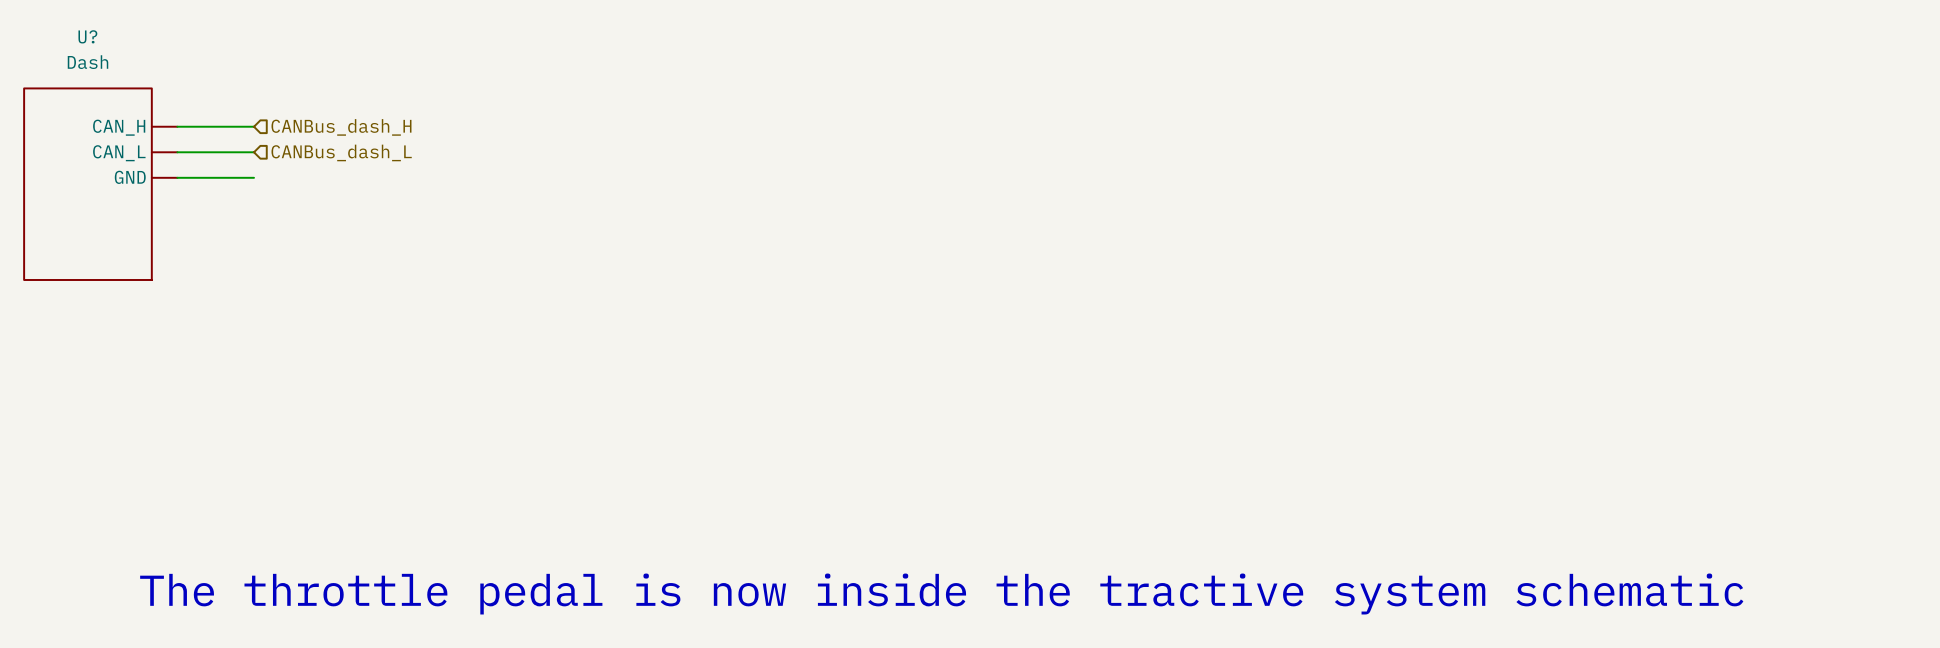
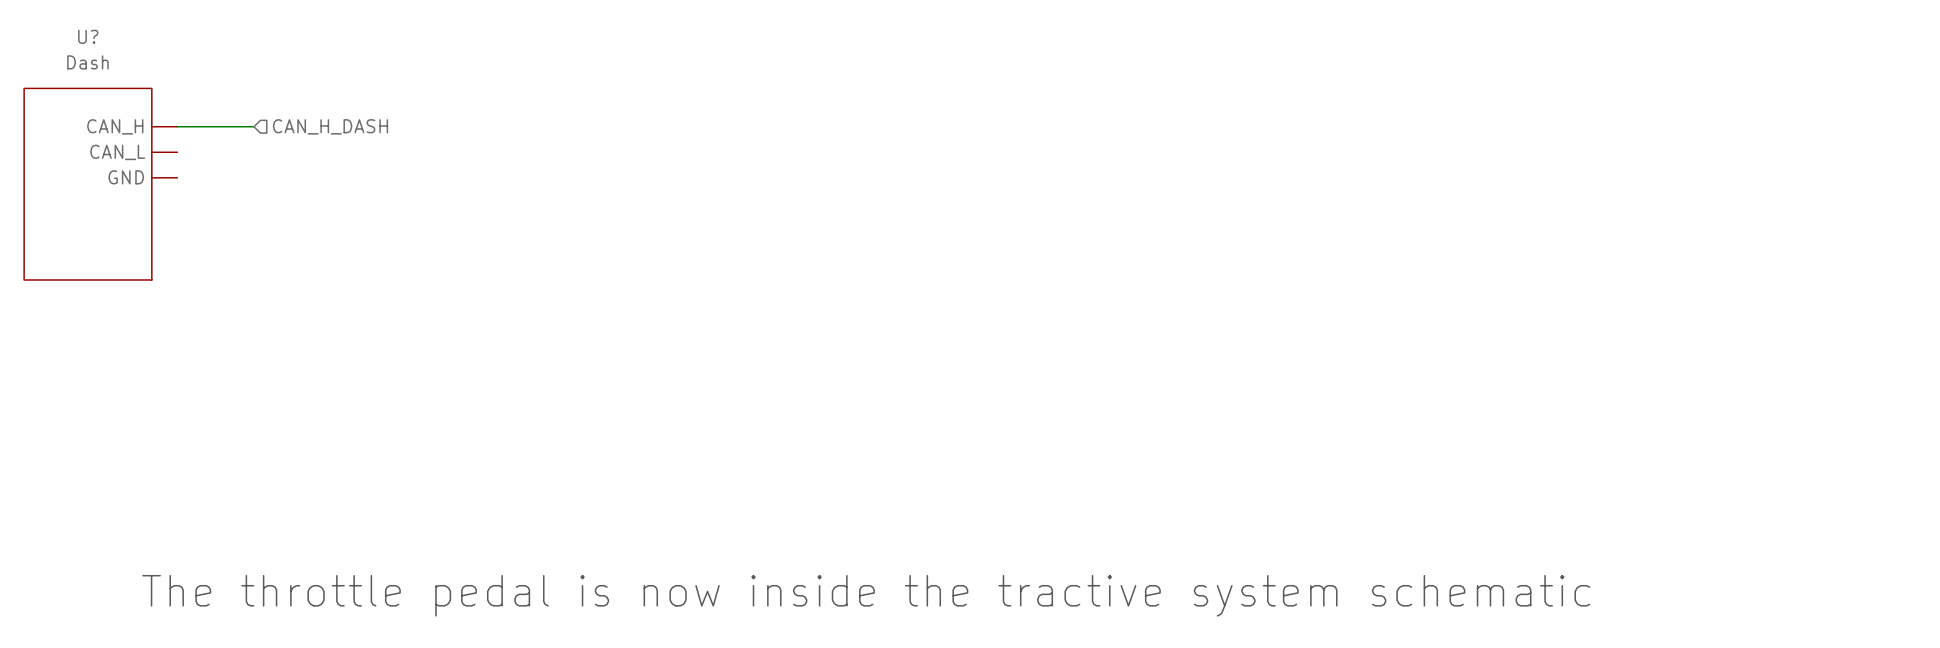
hierarchical label: CANBus_dash_H (341, 127) -> CAN_H_DASH (330, 126)
wire: (177, 152) (254, 152) -> none
hierarchical label: CANBus_dash_L (341, 152) -> none
wire: (177, 177) (254, 177) -> none

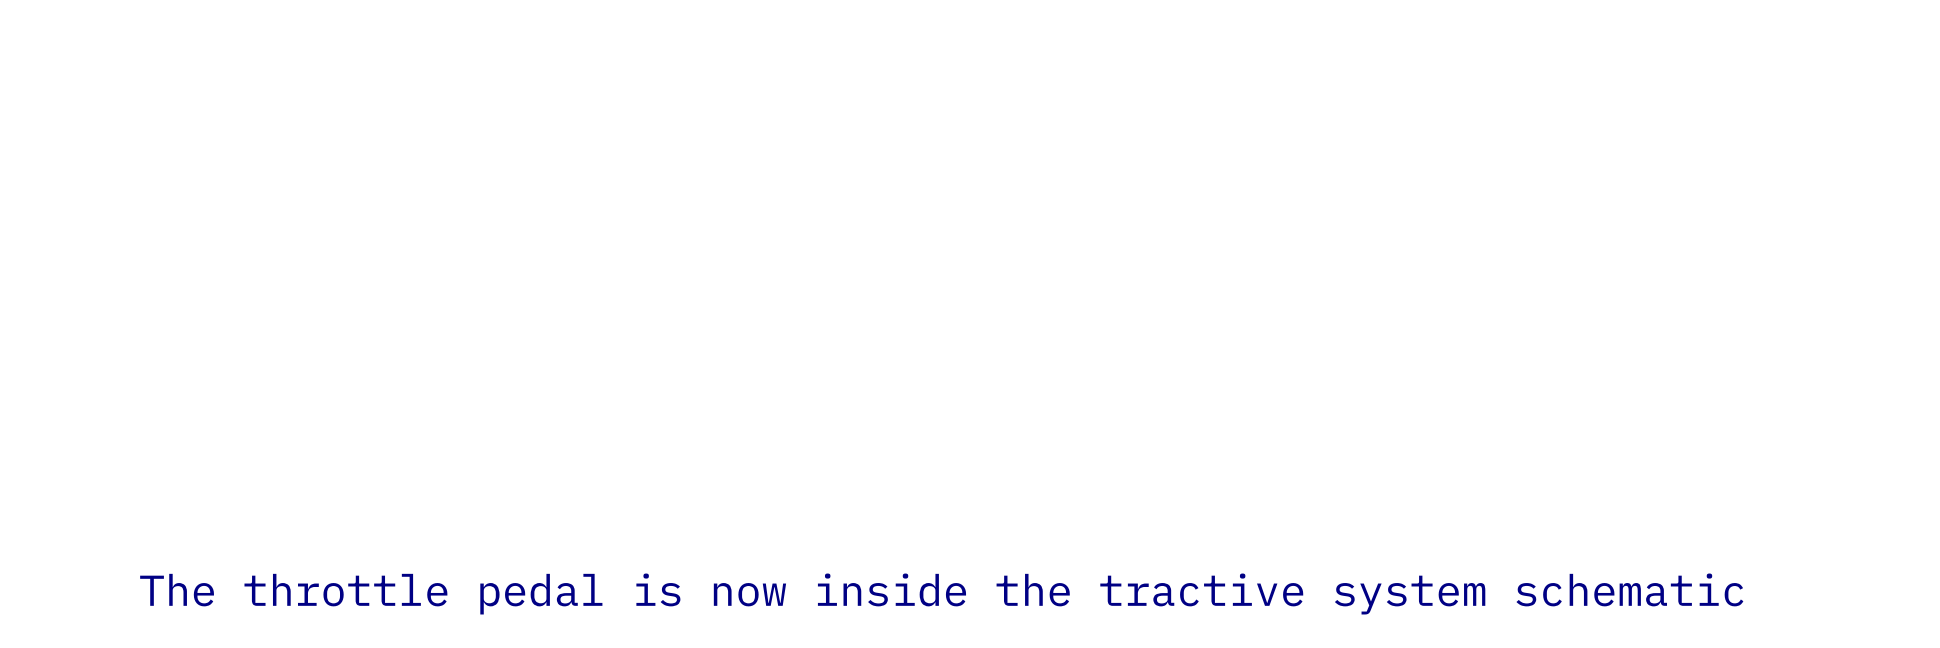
wire: (177, 126) (254, 126) -> none
hierarchical label: CAN_H_DASH (330, 126) -> none
U?: Dash (100, 184) -> none

